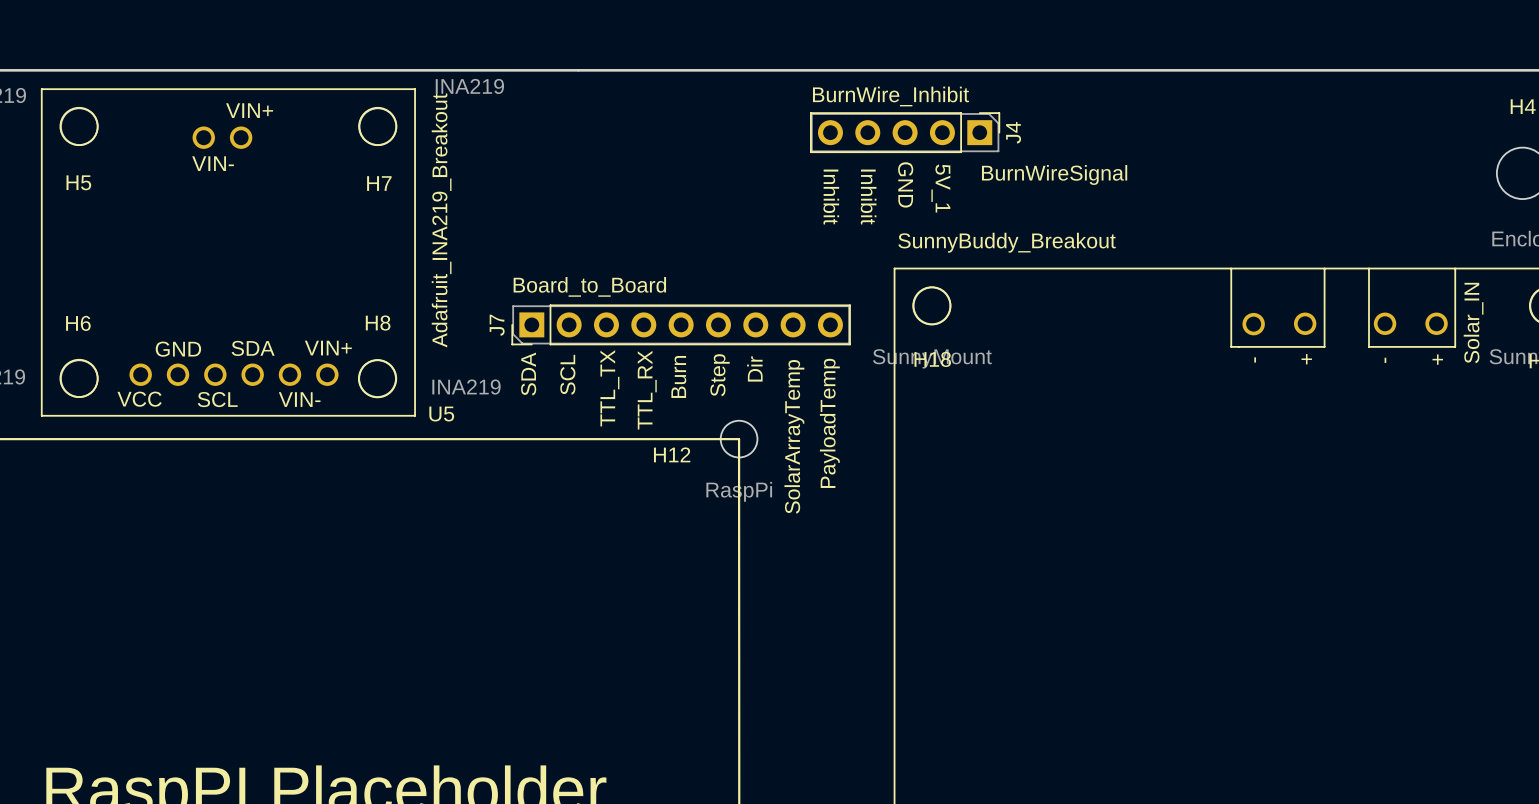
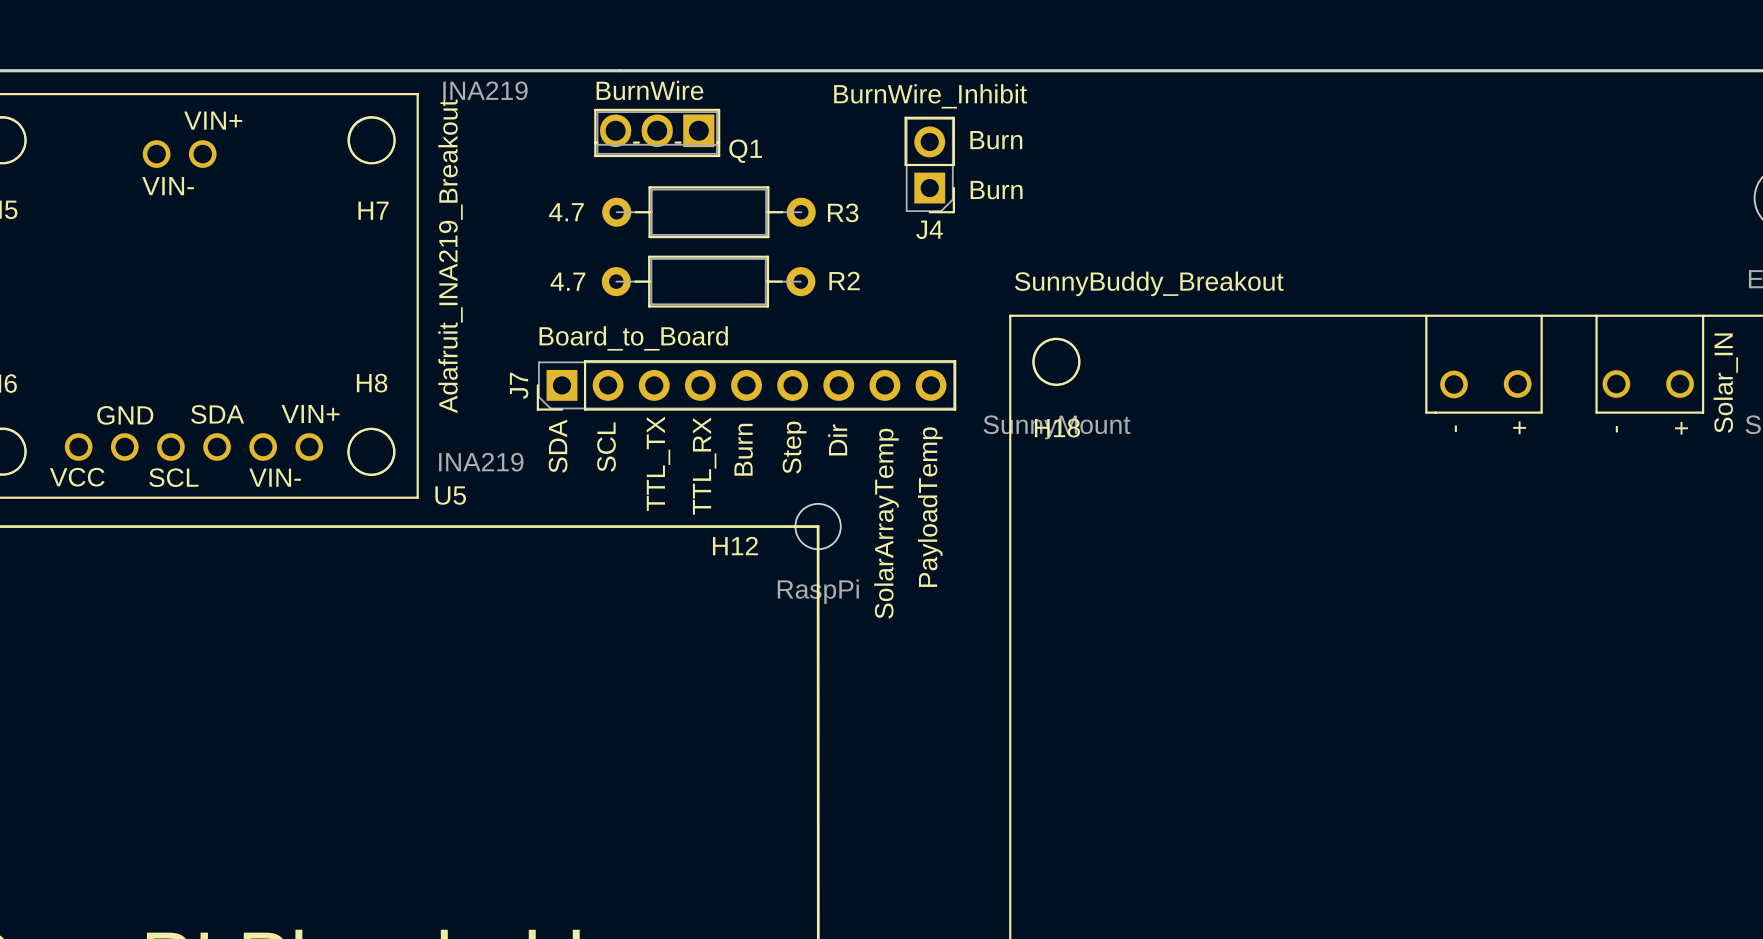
J4 footprint: [810, 112, 1001, 154] -> [904, 116, 955, 214]
Q1: none -> BurnWire (657, 132)
text: none -> Burn (996, 140)
J4 name position: J4 (1013, 132) -> J4 (929, 229)
text: none -> Burn (996, 190)
text: BurnWireSignal (1054, 174) -> none
R3: none -> 4.7 (708, 212)
text: GND (905, 184) -> none
text: 5V_1 (940, 188) -> none
text: Inhibit (831, 197) -> none
text: Inhibit (868, 197) -> none
R2: none -> 4.7 (708, 281)

